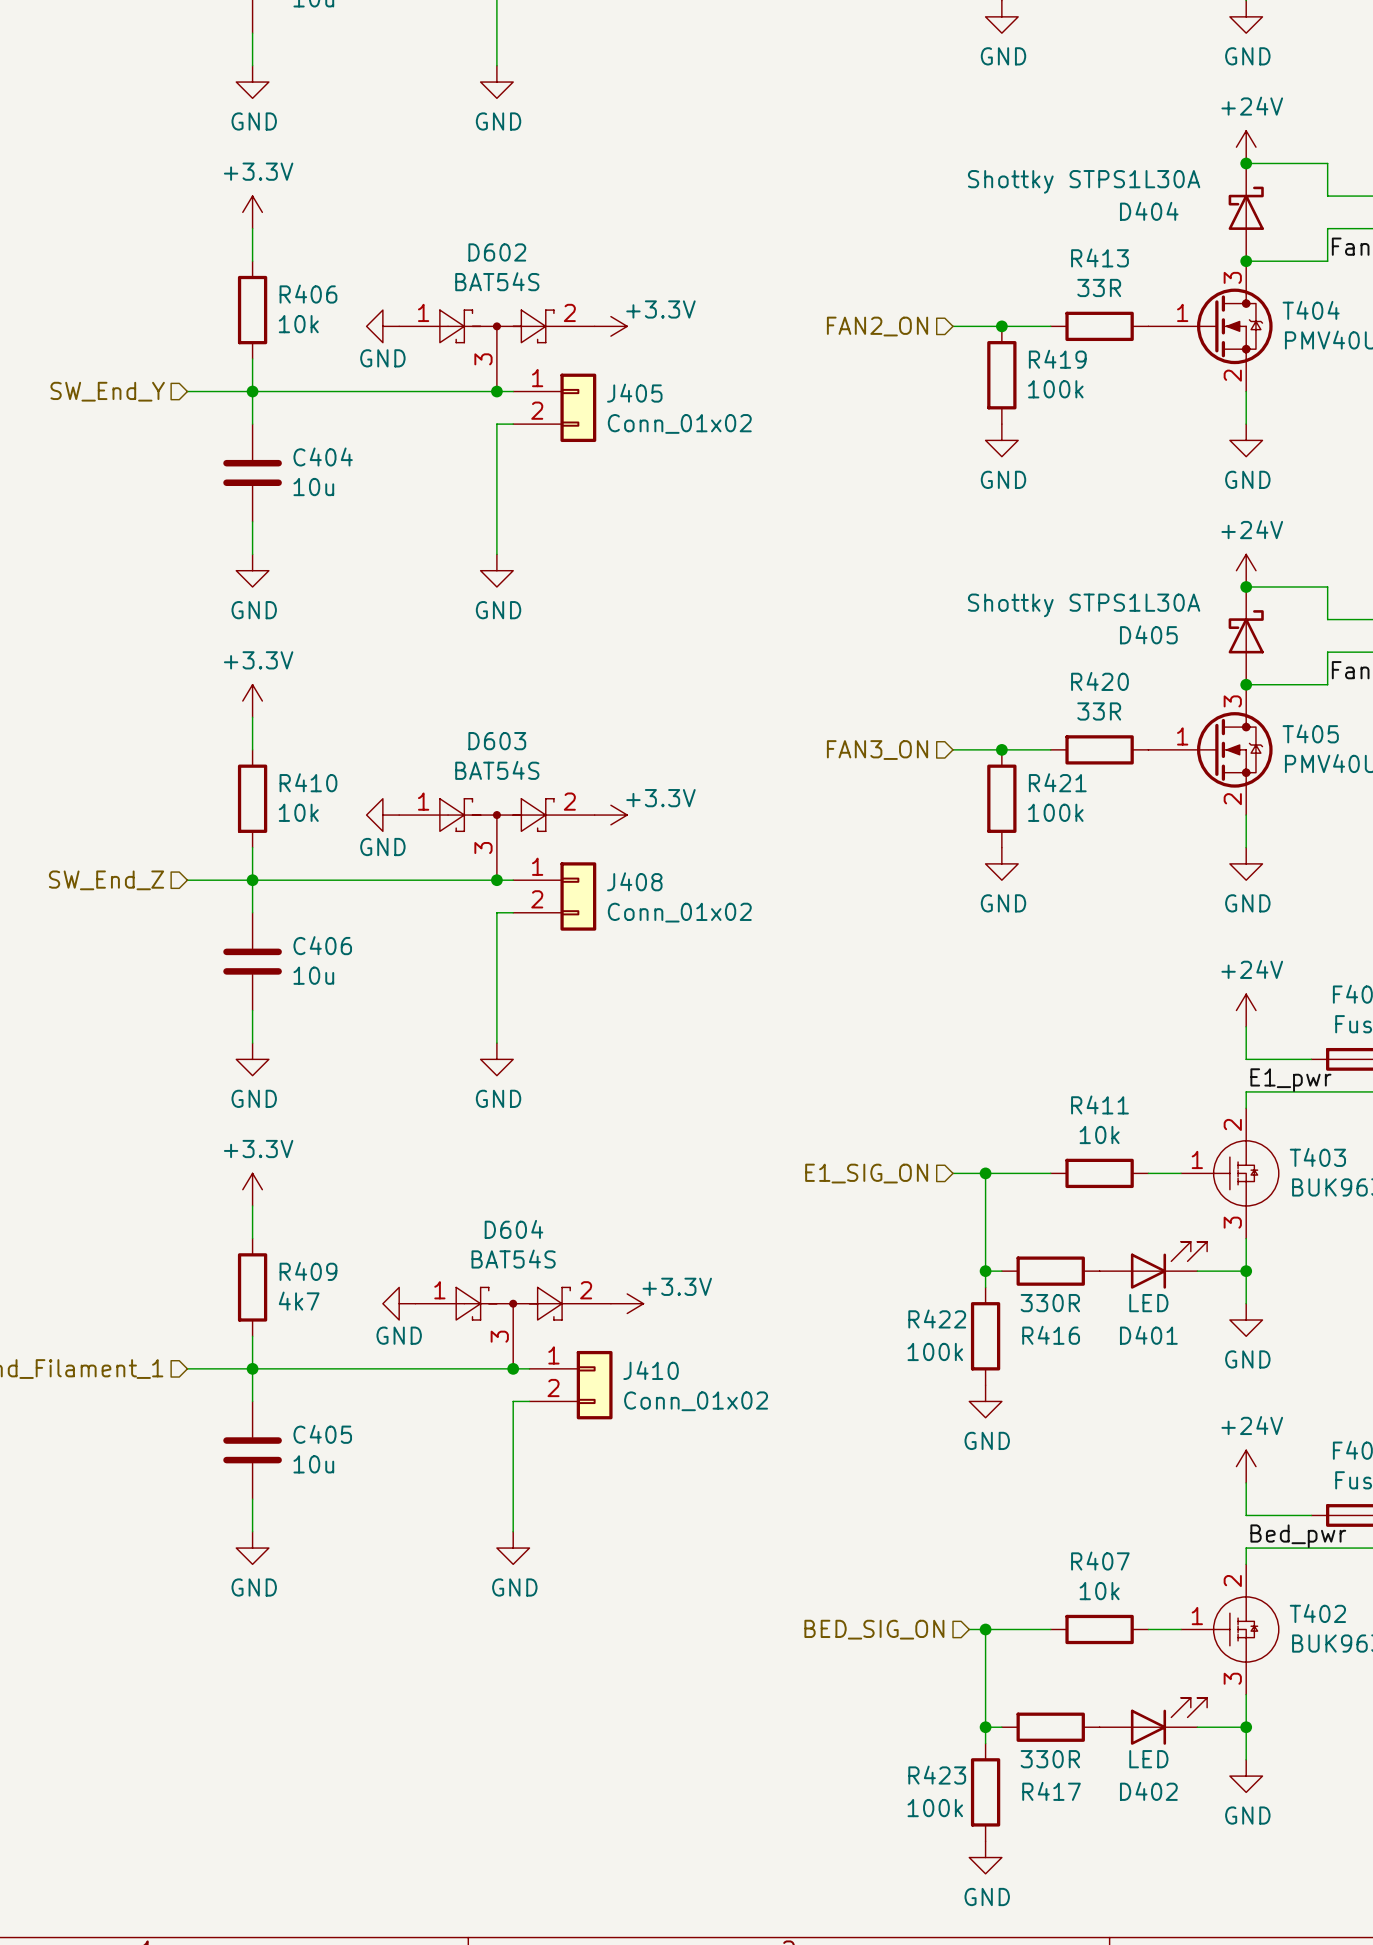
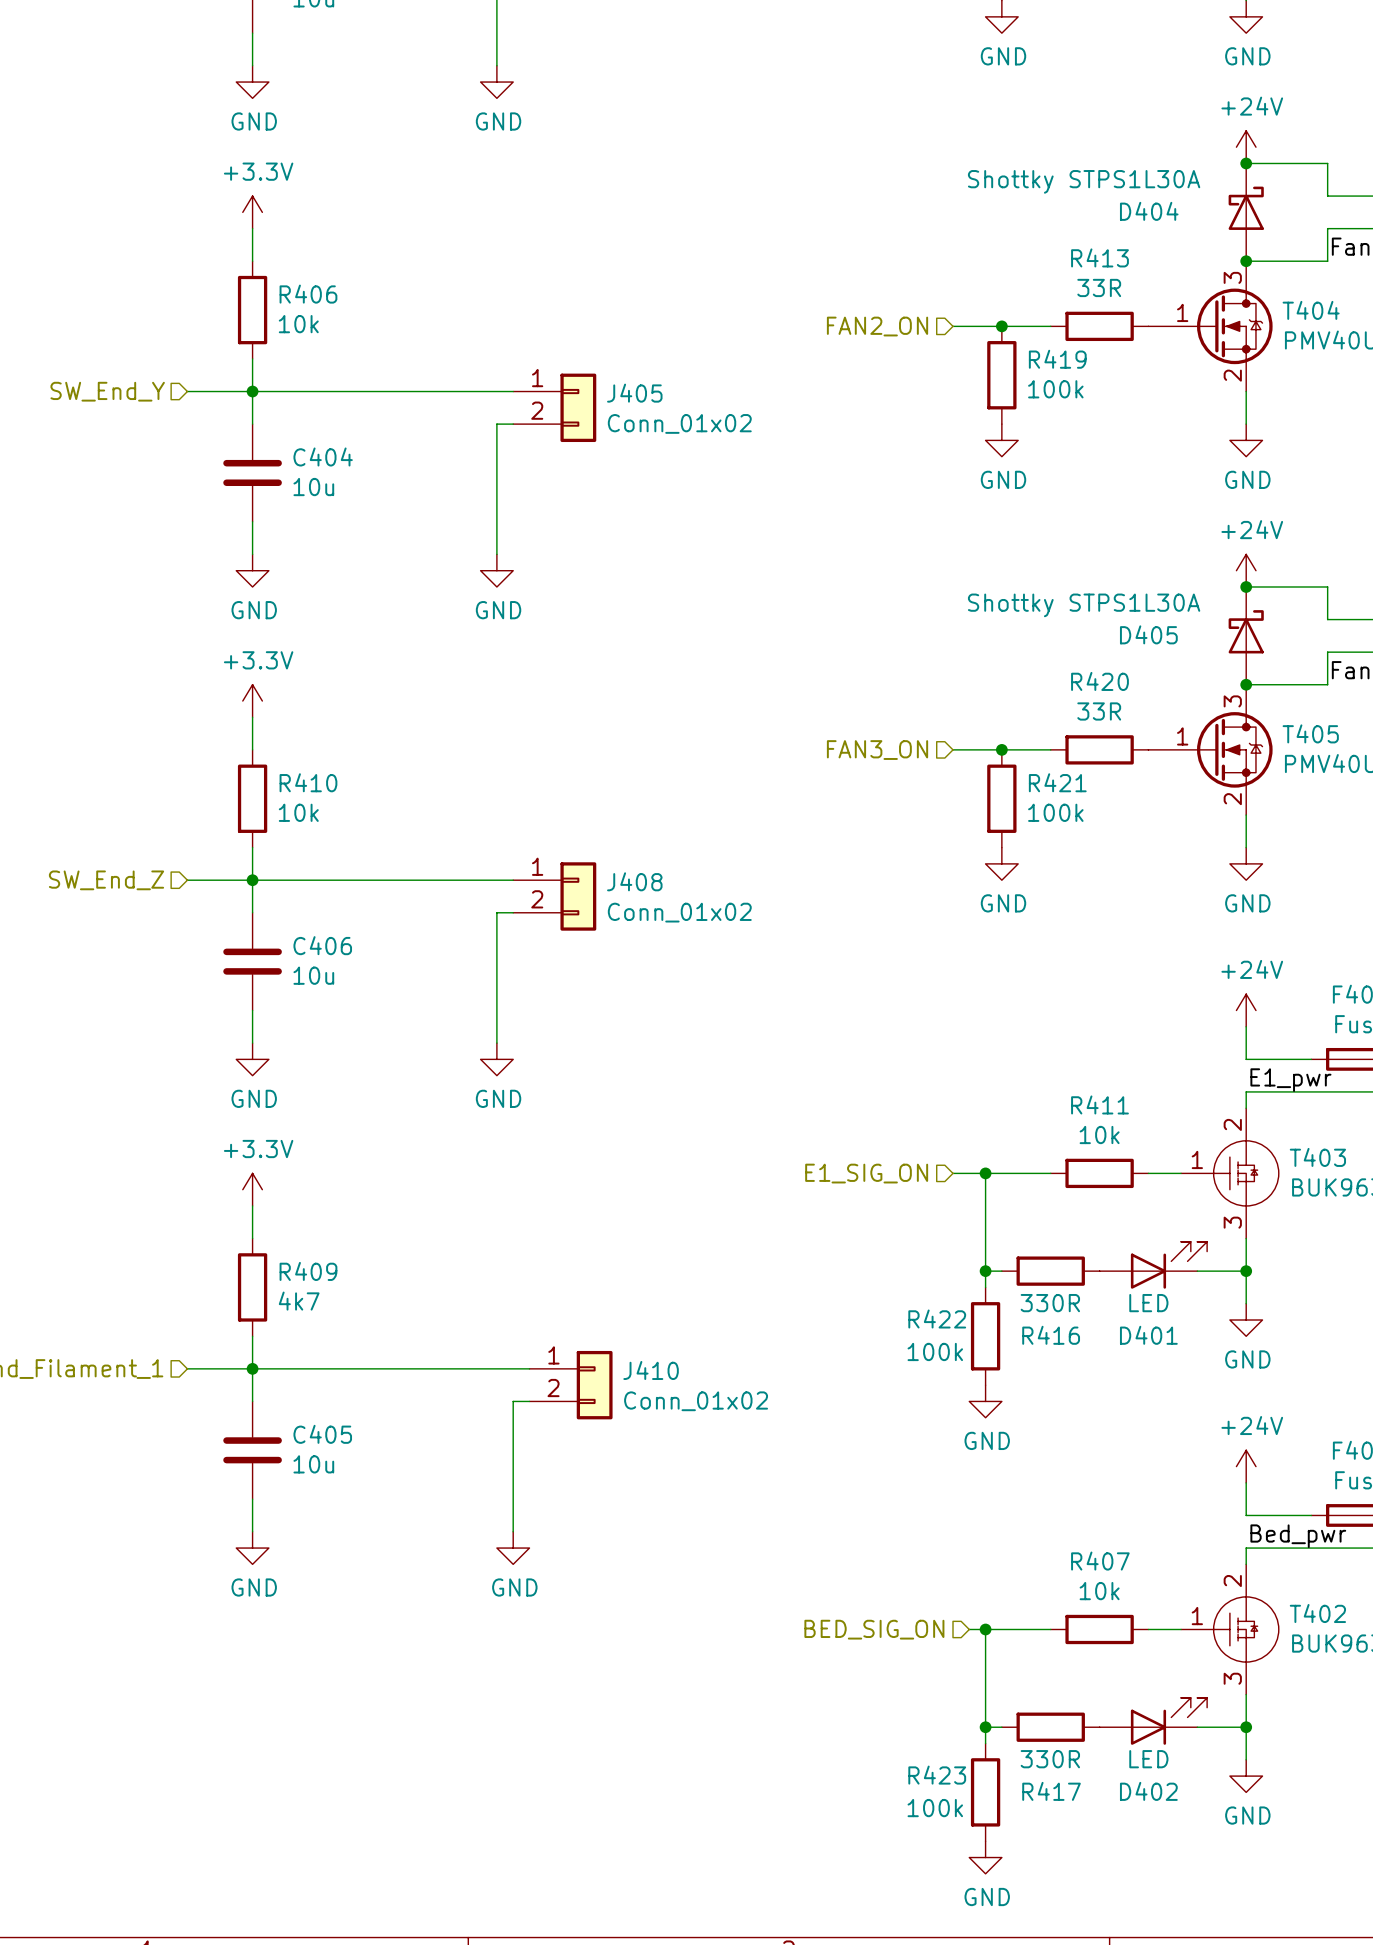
power symbol: GND (382, 326) -> none
power symbol: +3.3V (610, 326) -> none
D602: BAT54S (496, 350) -> none
junction: (496, 391) -> none
power symbol: GND (382, 815) -> none
power symbol: +3.3V (610, 815) -> none
D603: BAT54S (496, 839) -> none
junction: (496, 880) -> none
power symbol: GND (399, 1303) -> none
power symbol: +3.3V (627, 1303) -> none
D604: BAT54S (513, 1328) -> none
junction: (513, 1368) -> none

